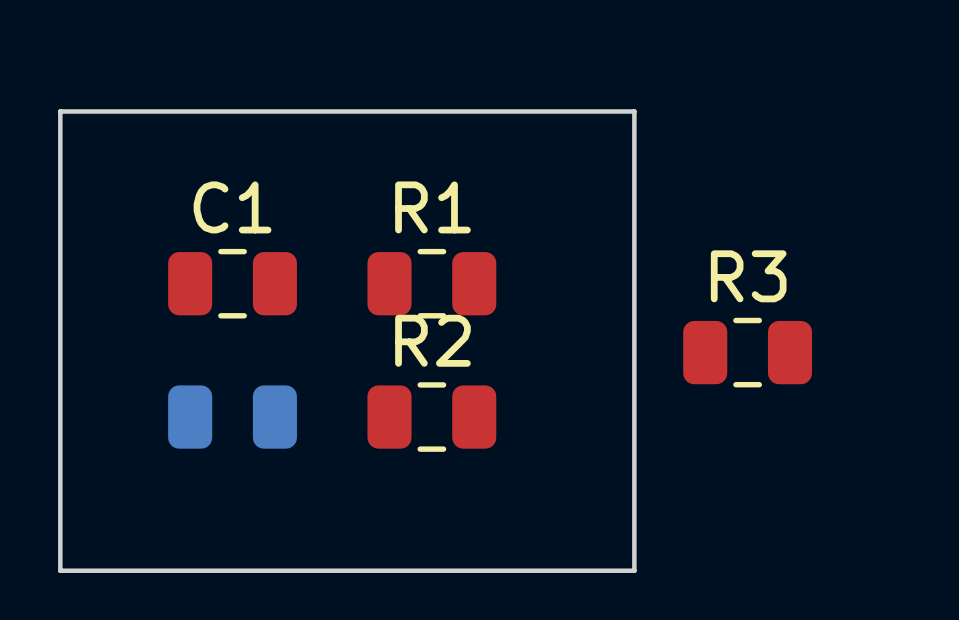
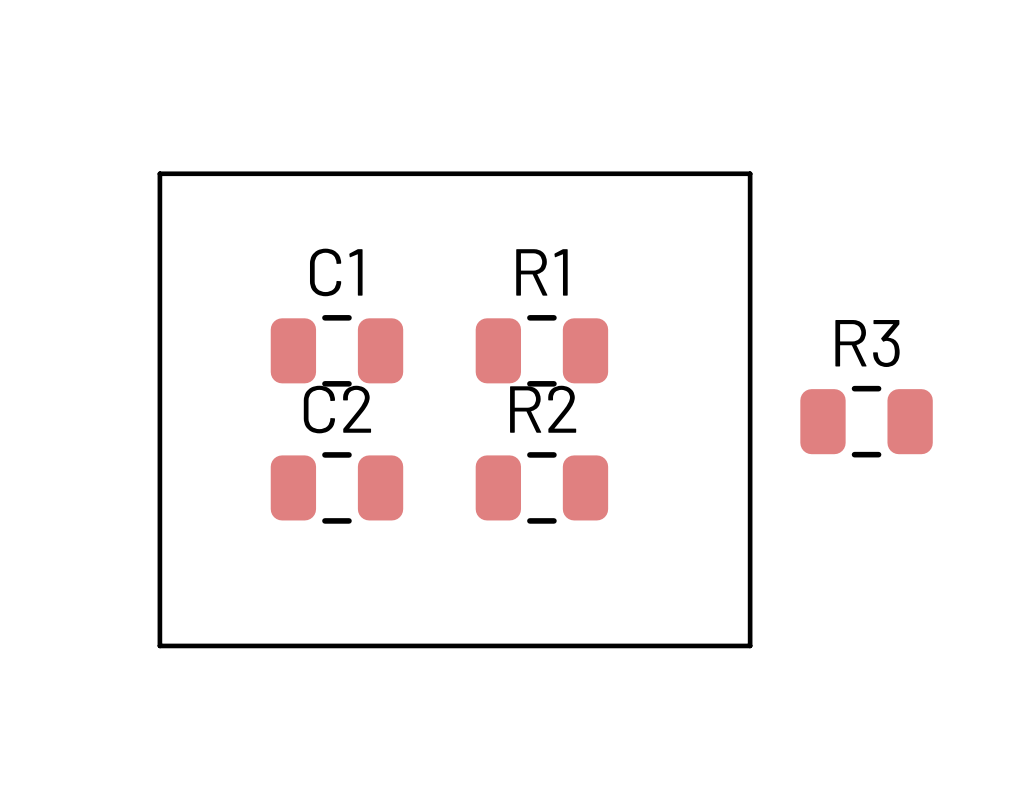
C2 side: bottom (232, 417) -> top (336, 487)

